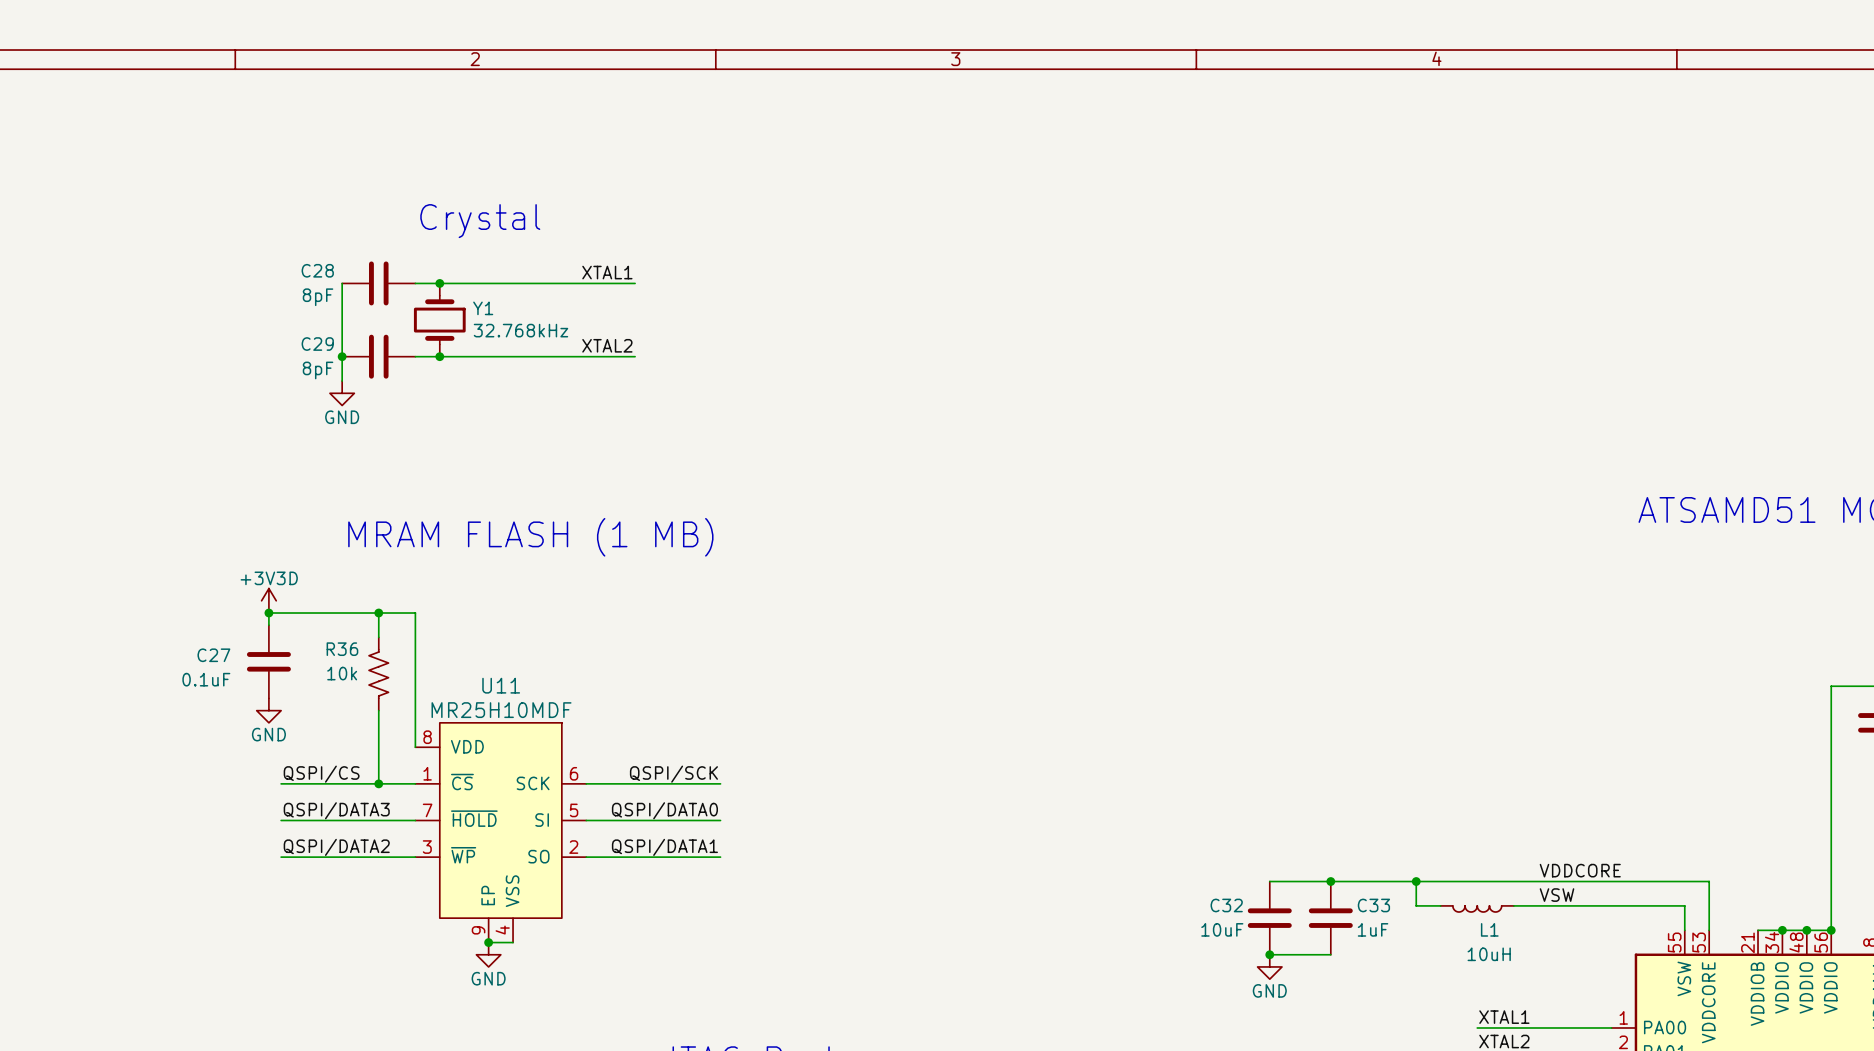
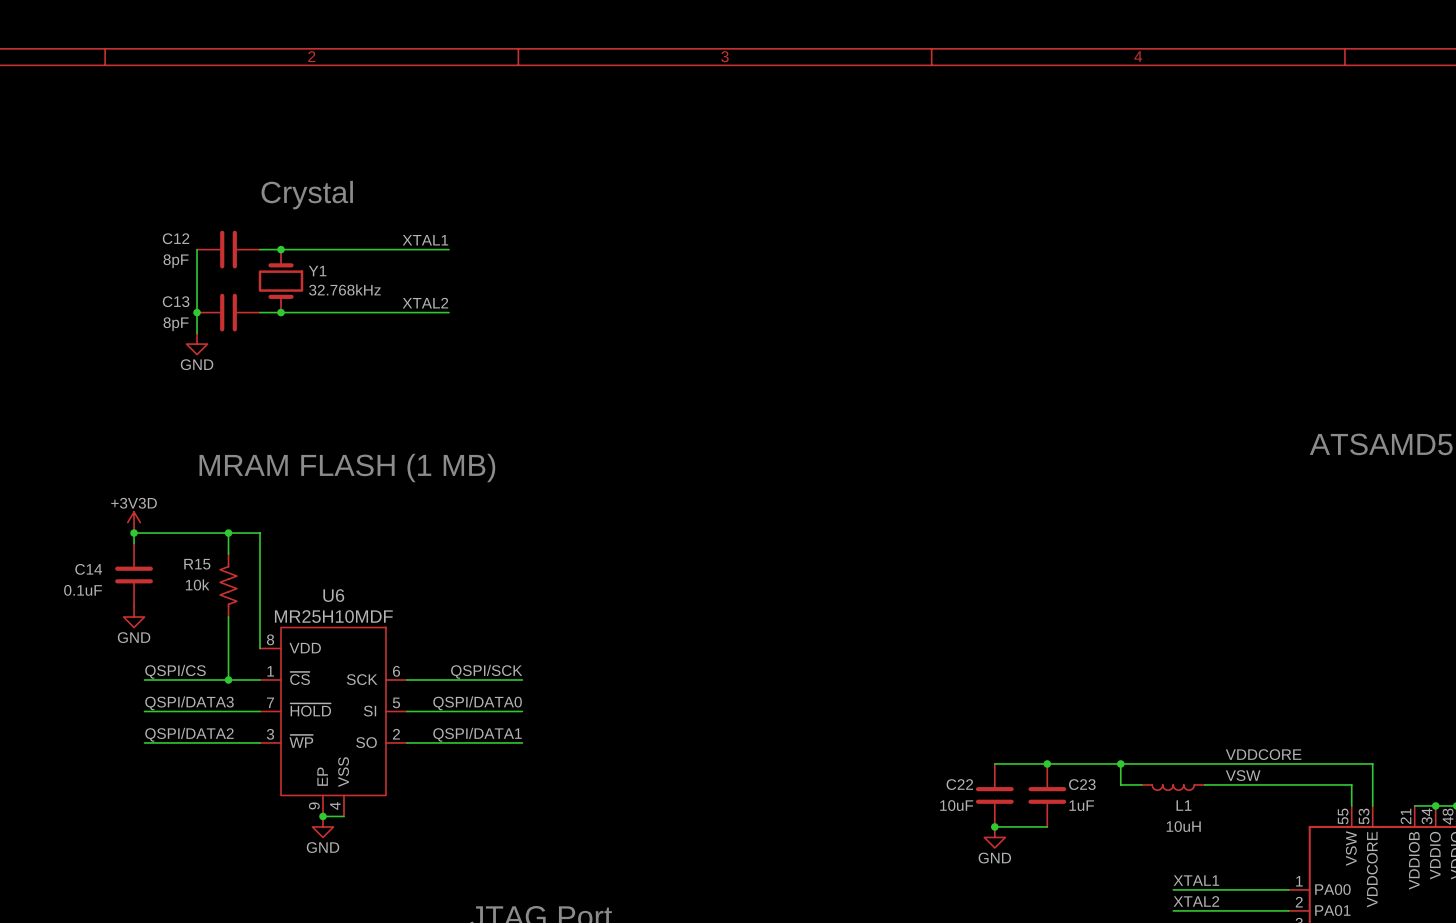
C28 name: C28 (317, 270) -> C12 (176, 238)
C29 name: C29 (317, 344) -> C13 (176, 301)
R36 name: R36 (342, 649) -> R15 (197, 564)
C27 name: C27 (213, 655) -> C14 (88, 569)
U11 name: U11 (501, 685) -> U6 (333, 595)
C32 name: C32 (1226, 905) -> C22 (959, 784)
C33 name: C33 (1373, 905) -> C23 (1082, 784)

